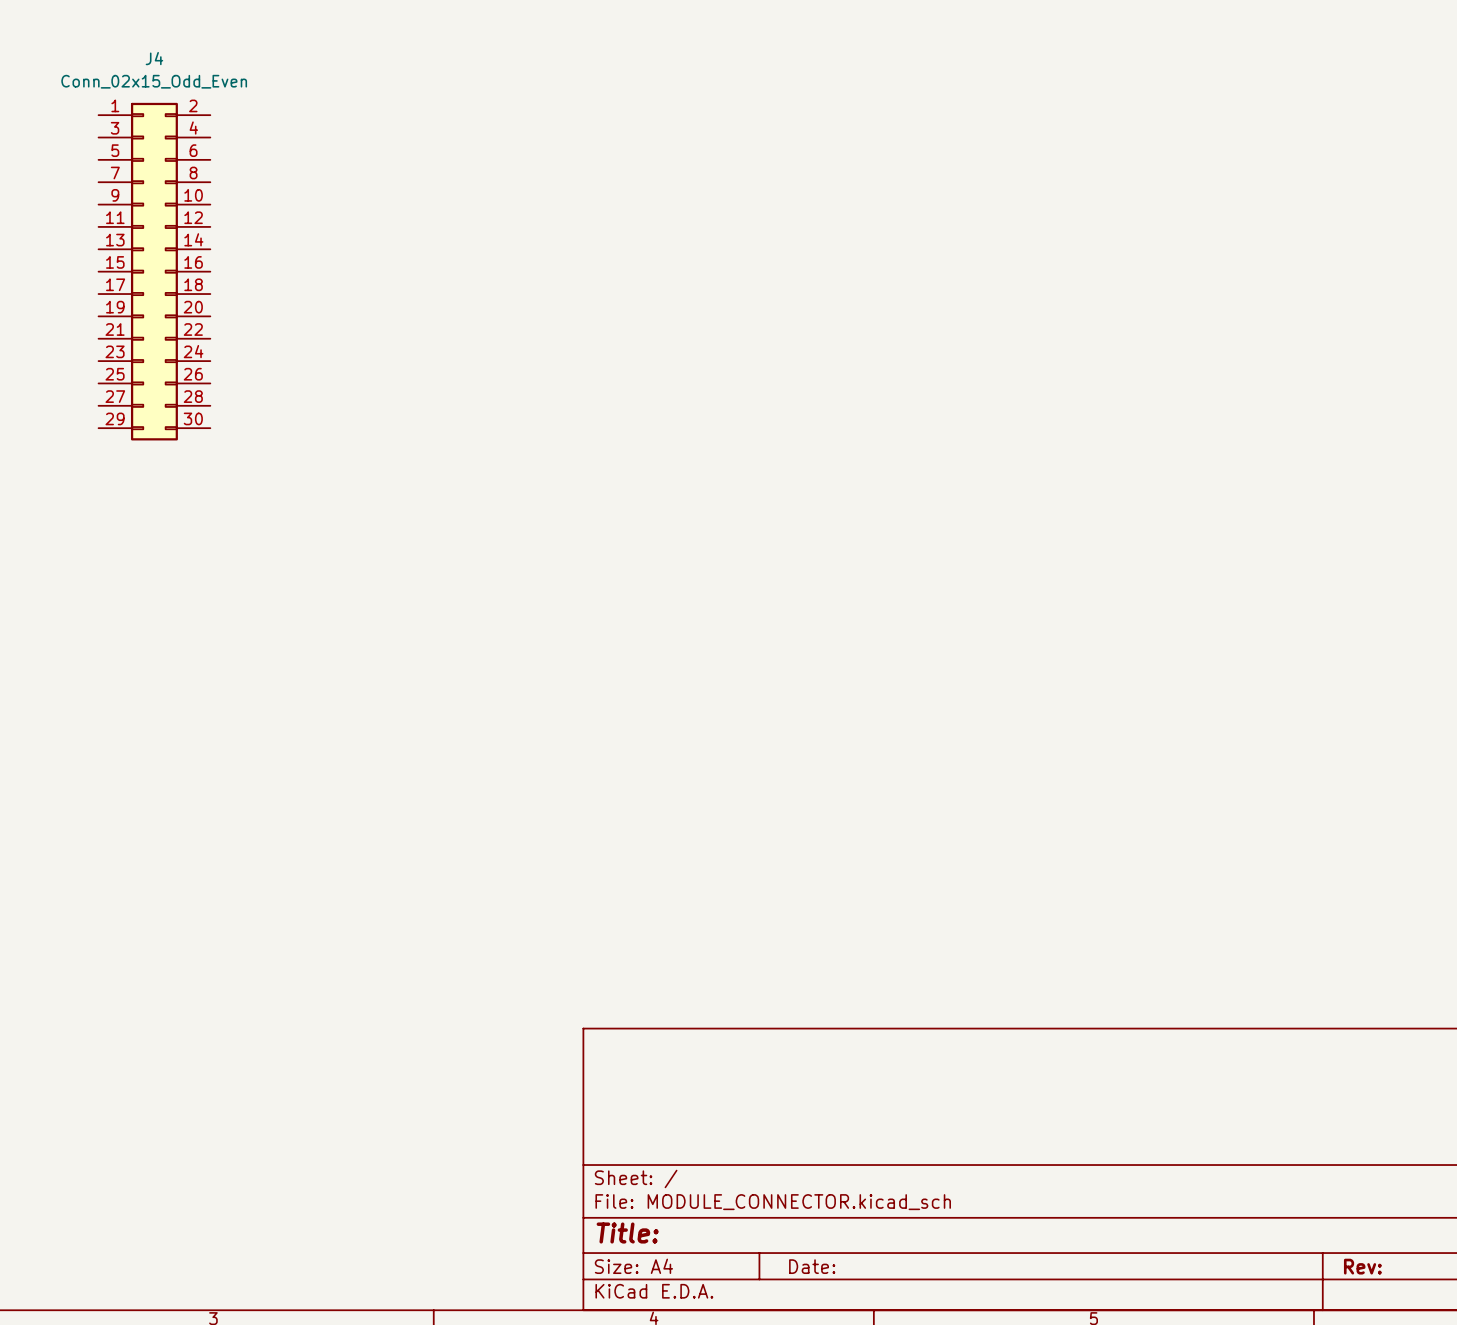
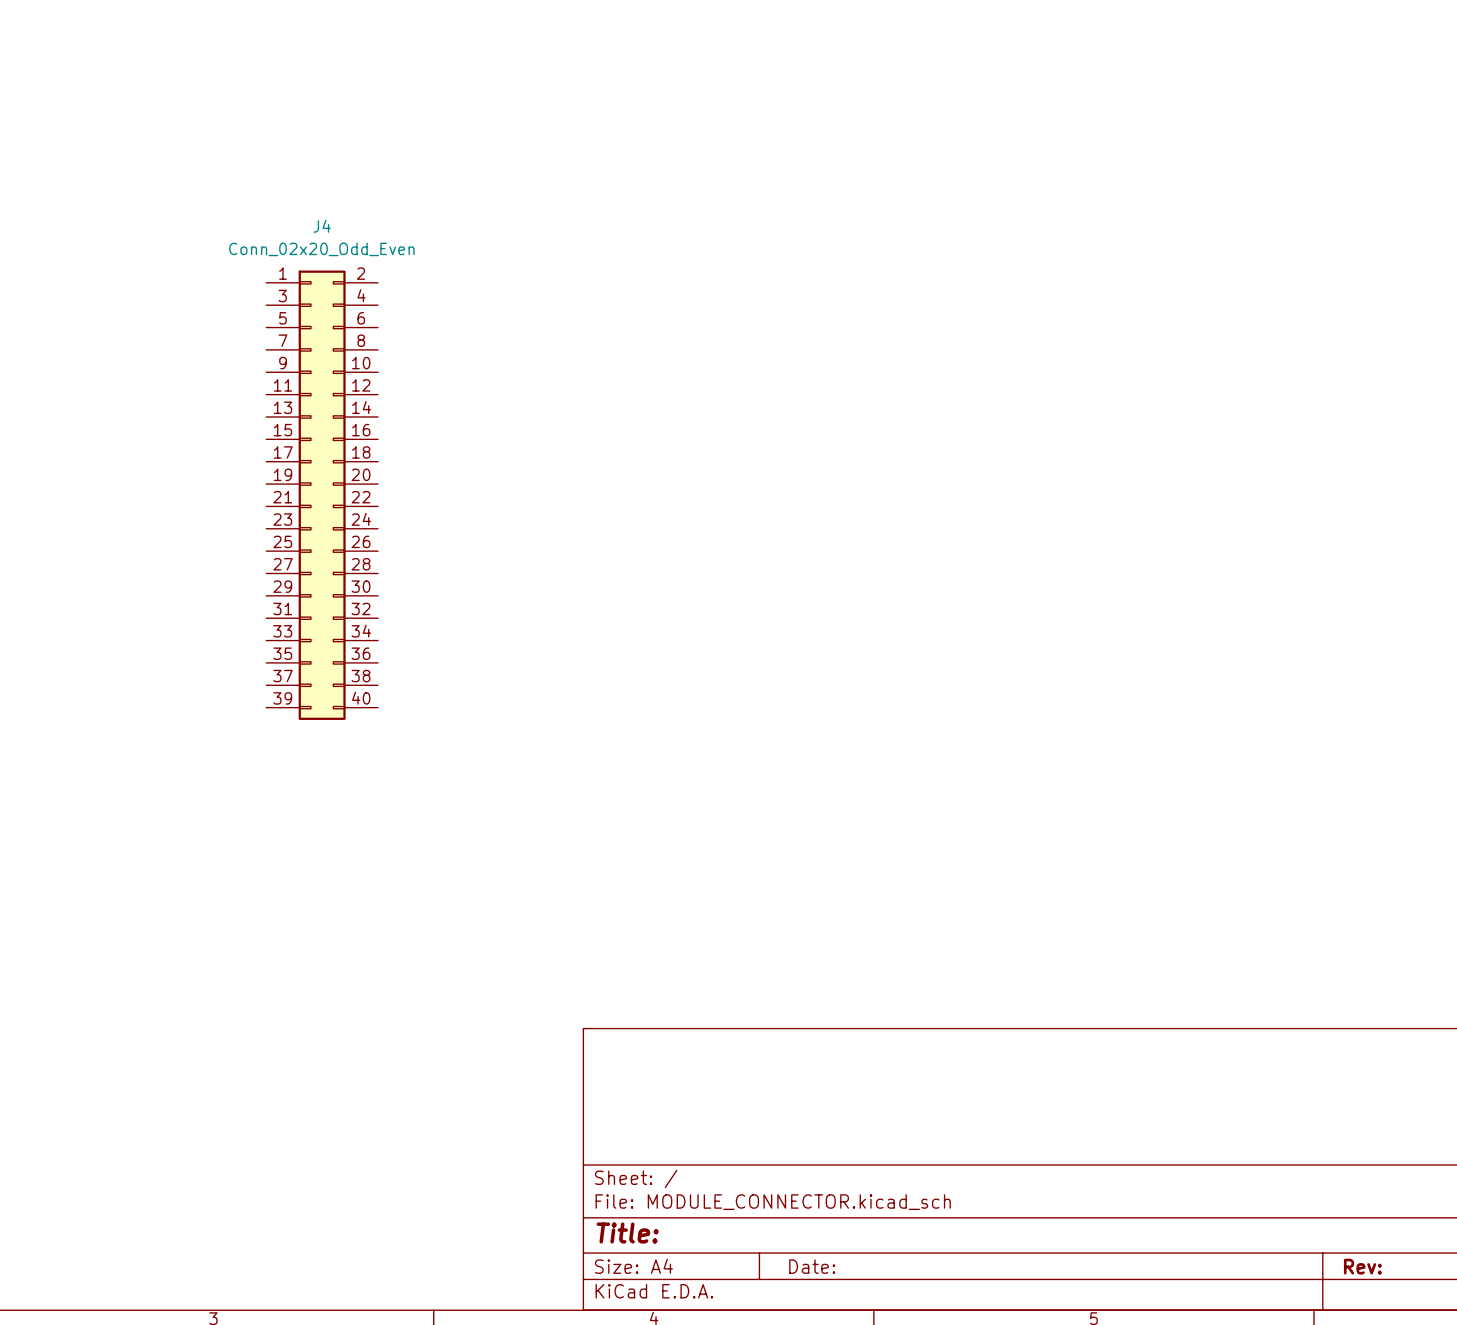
J4 name position: J4 (154, 58) -> J4 (322, 226)
J4 value: Conn_02x15_Odd_Even (154, 81) -> Conn_02x20_Odd_Even (321, 249)
J4 symbol: [98, 102, 211, 441] -> [266, 270, 379, 720]

